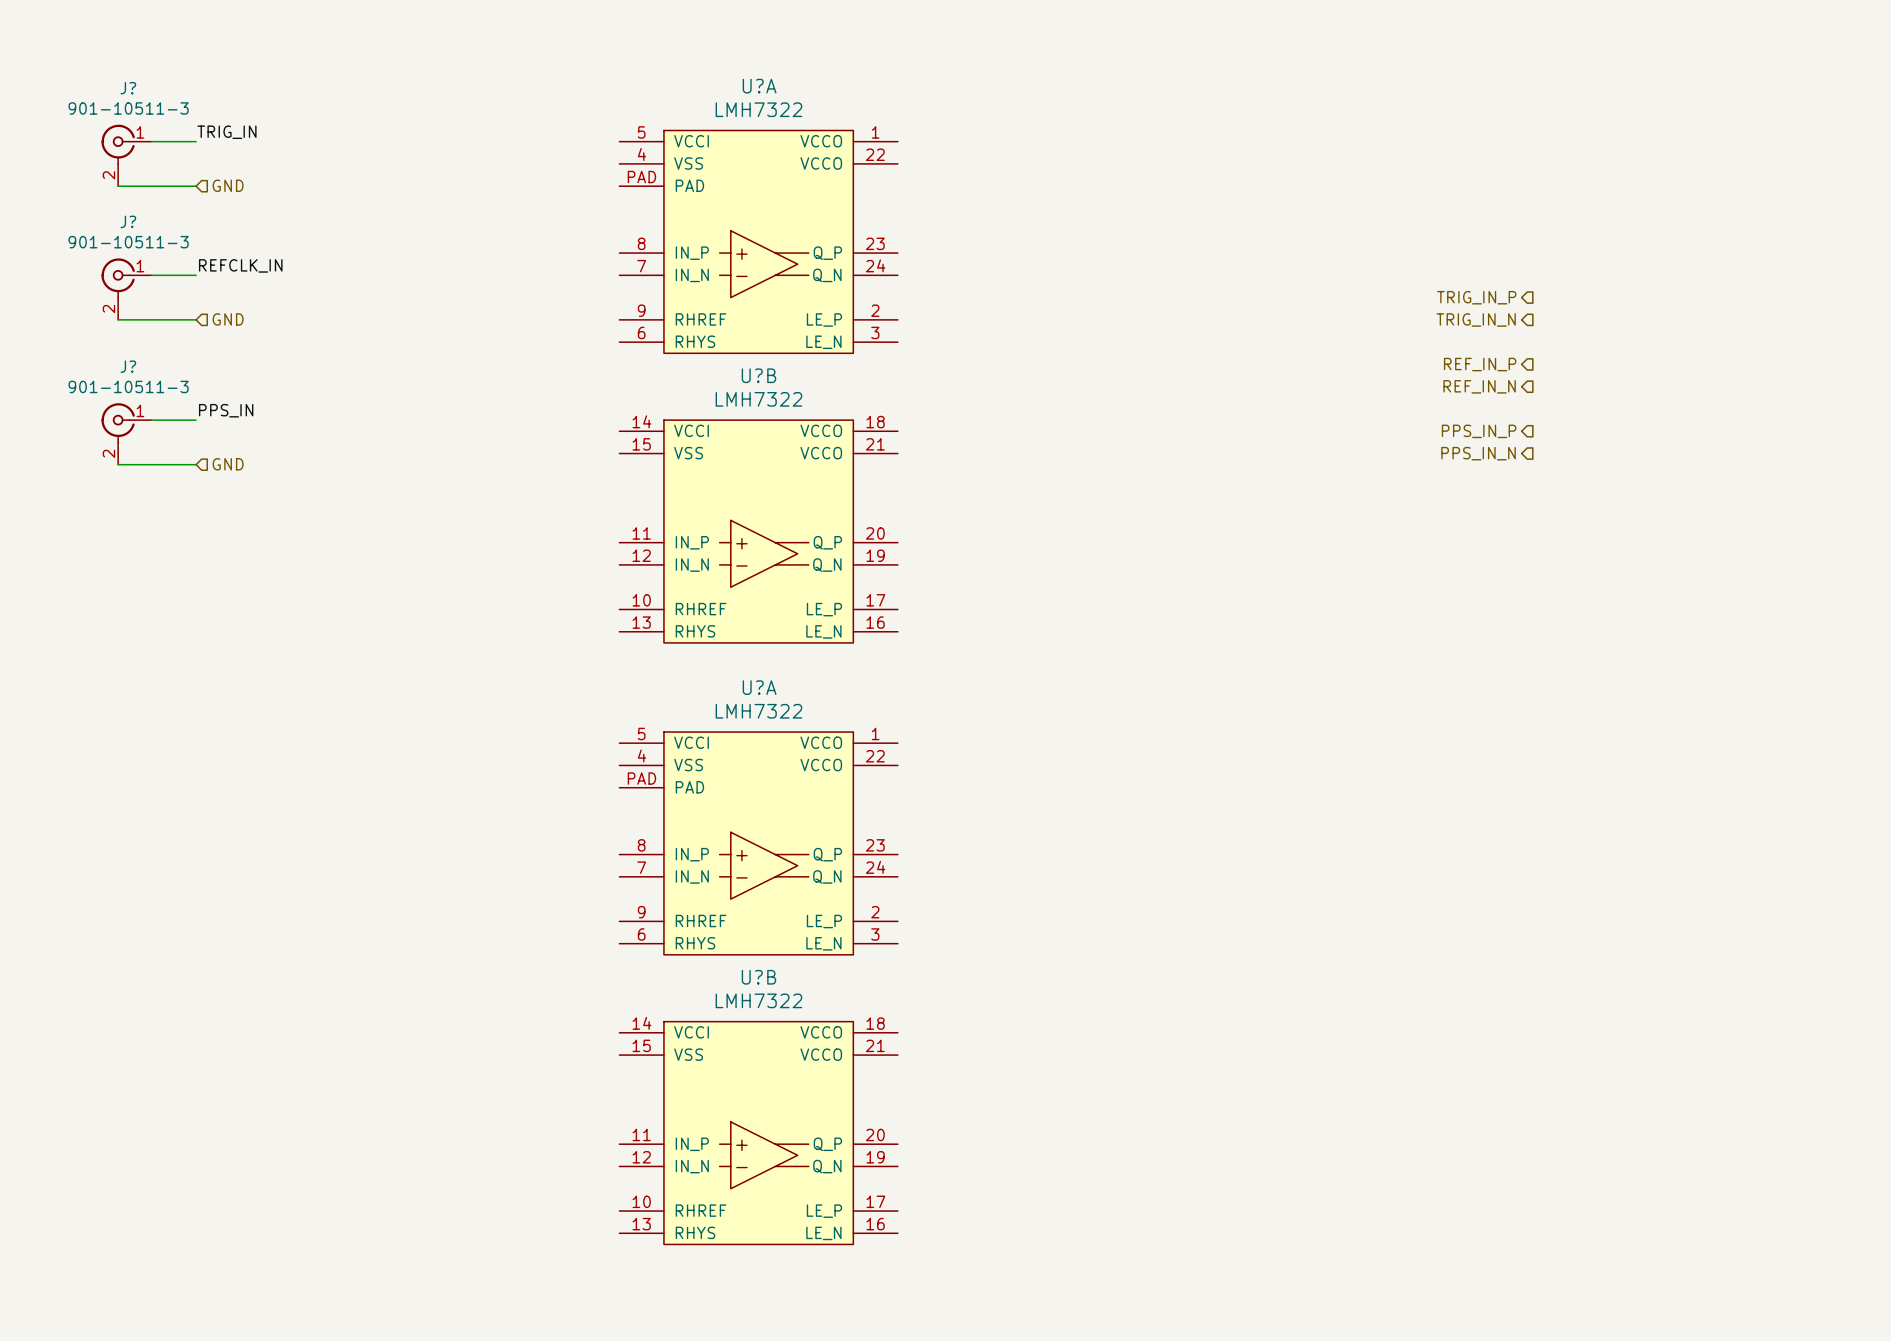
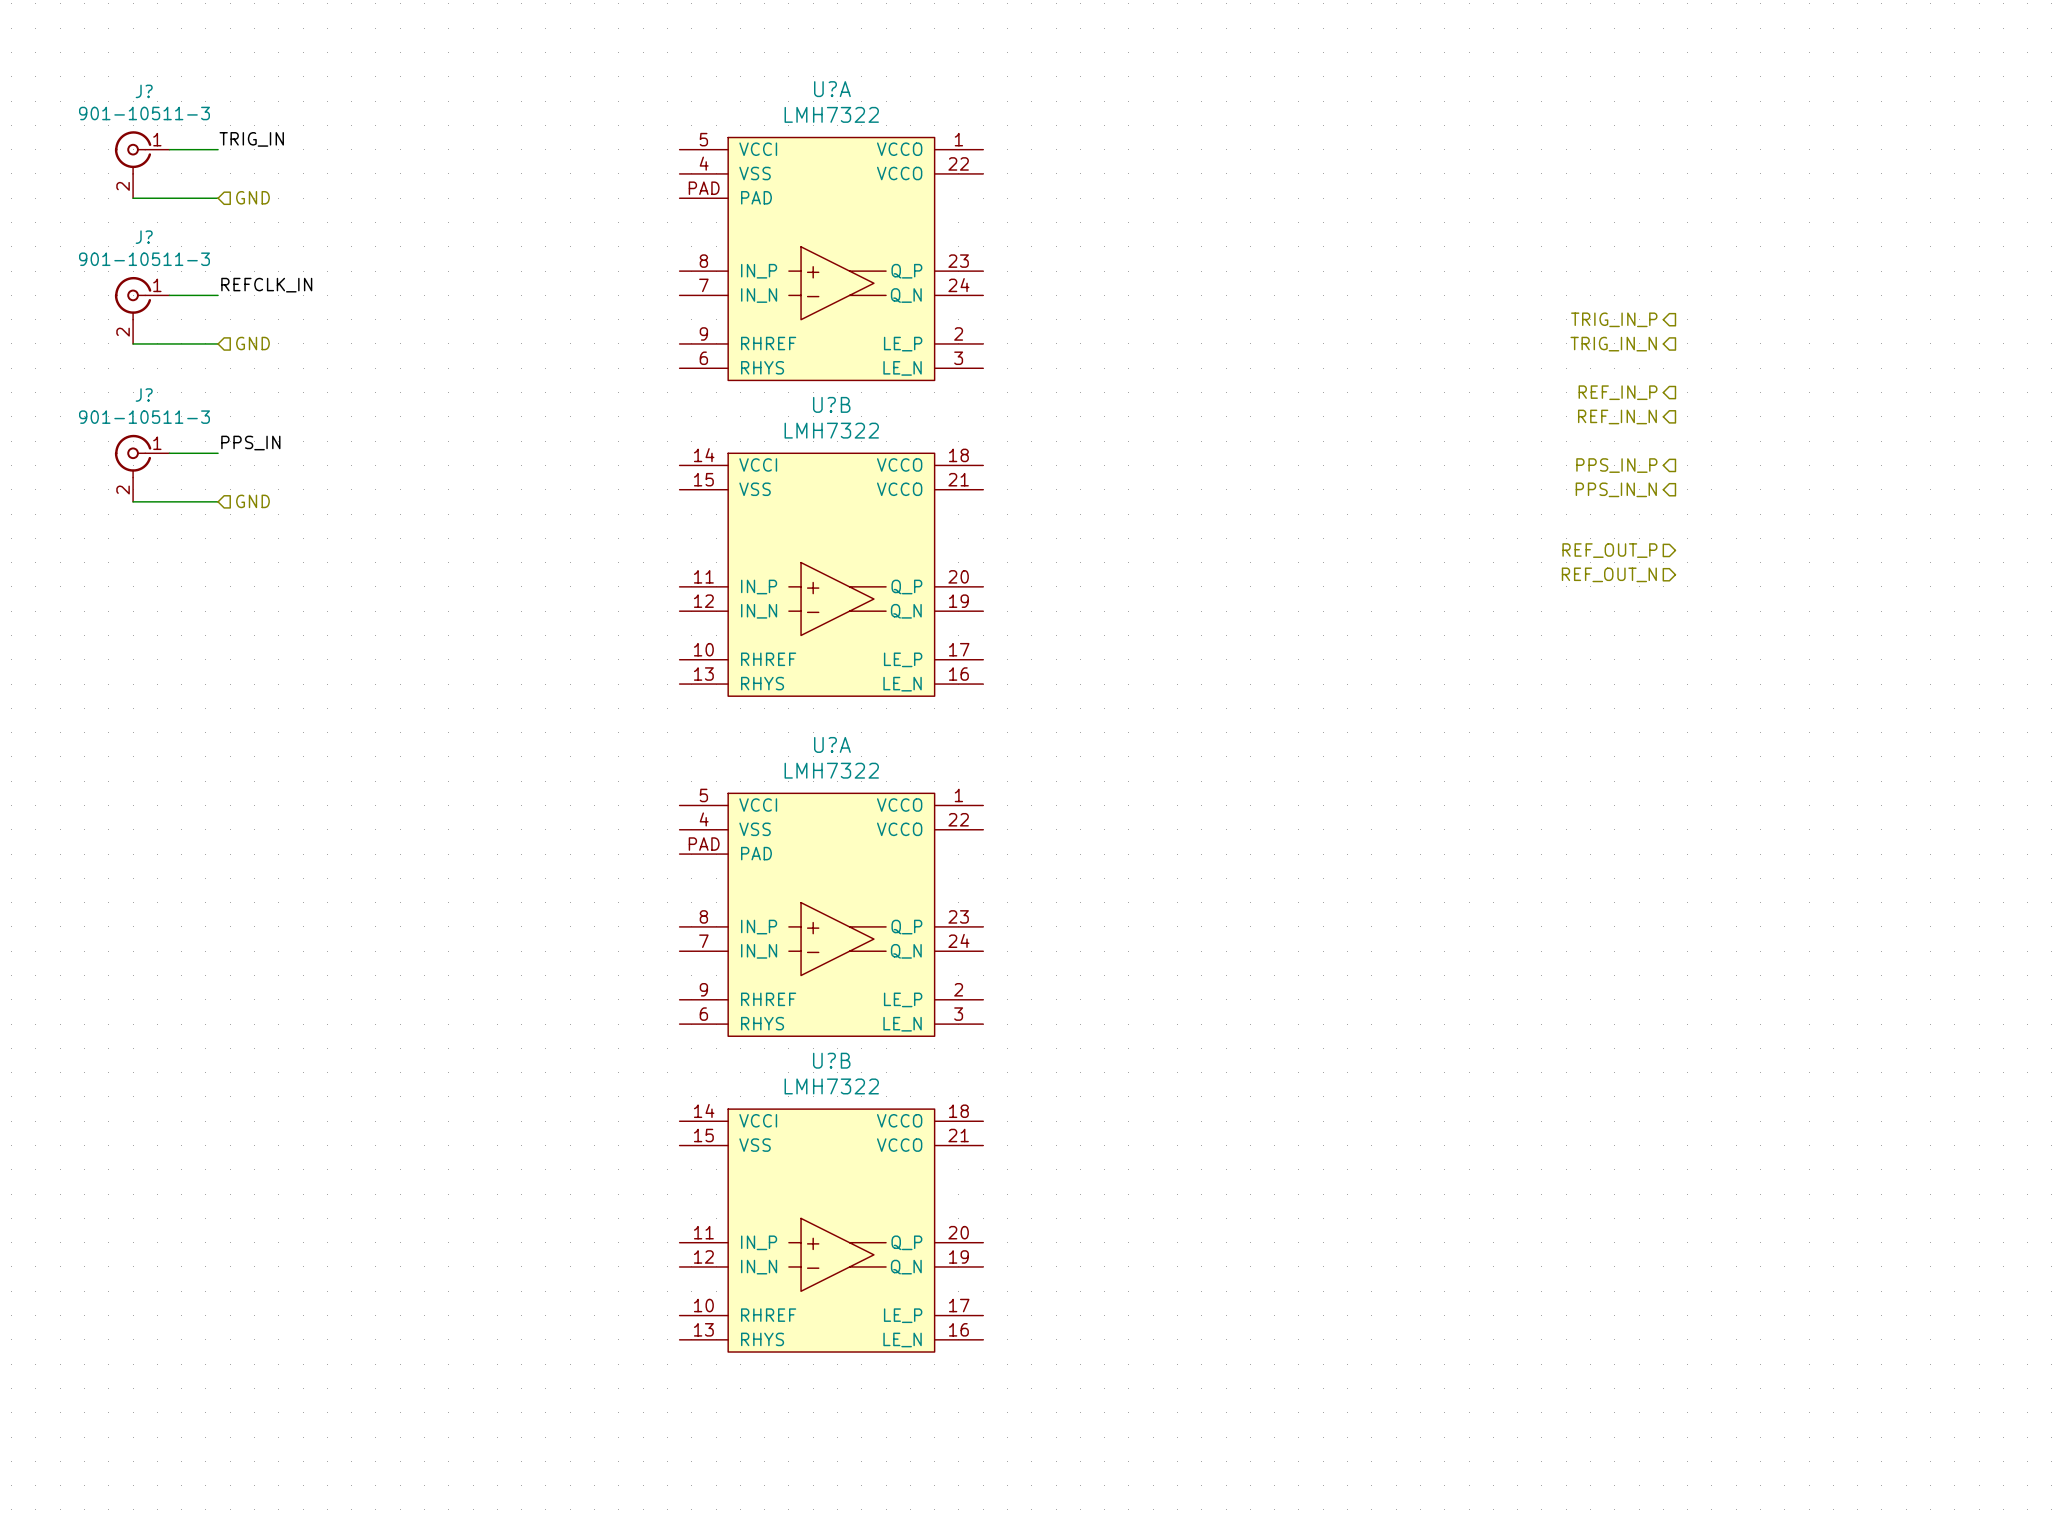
hierarchical label: none -> REF_OUT_P (1609, 550)
hierarchical label: none -> REF_OUT_N (1609, 574)

